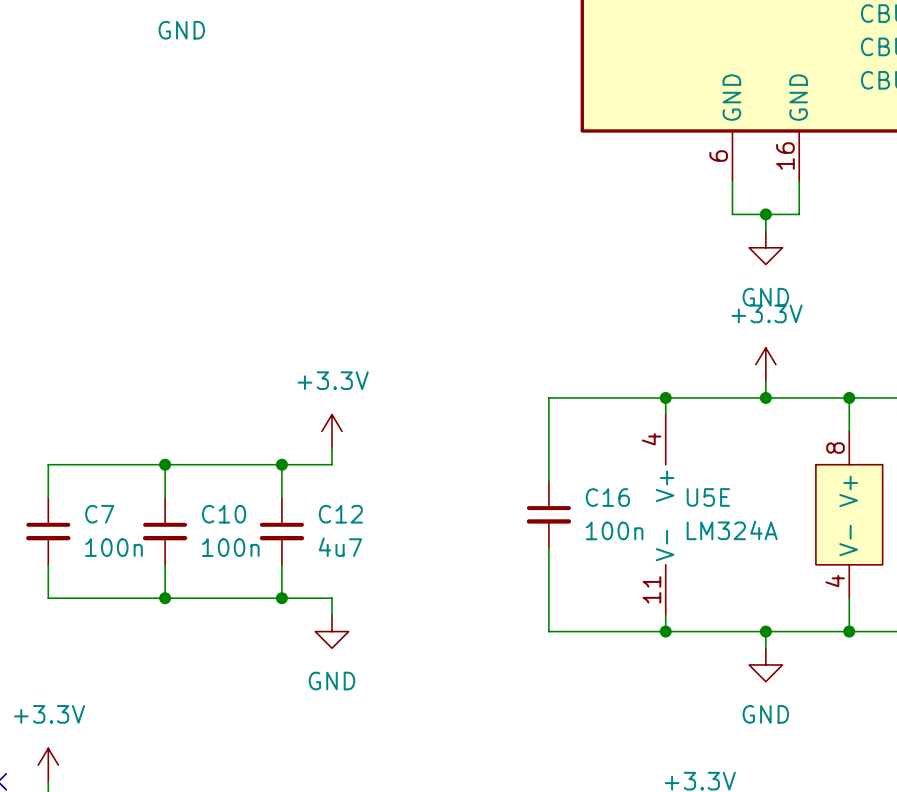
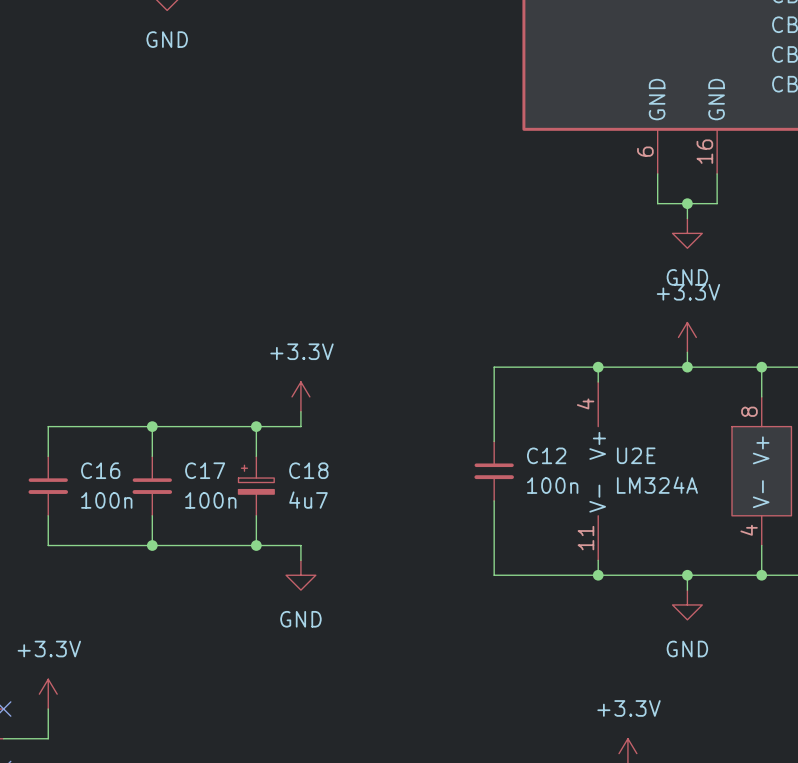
C16 name: C16 (607, 497) -> C12 (546, 455)
U5E name: U5E (708, 497) -> U2E (636, 455)
C7 name: C7 (99, 514) -> C16 (100, 470)
C10 name: C10 (224, 514) -> C17 (205, 470)
C12: 4u7 (281, 531) -> none
C18: none -> 4u7 (256, 486)

